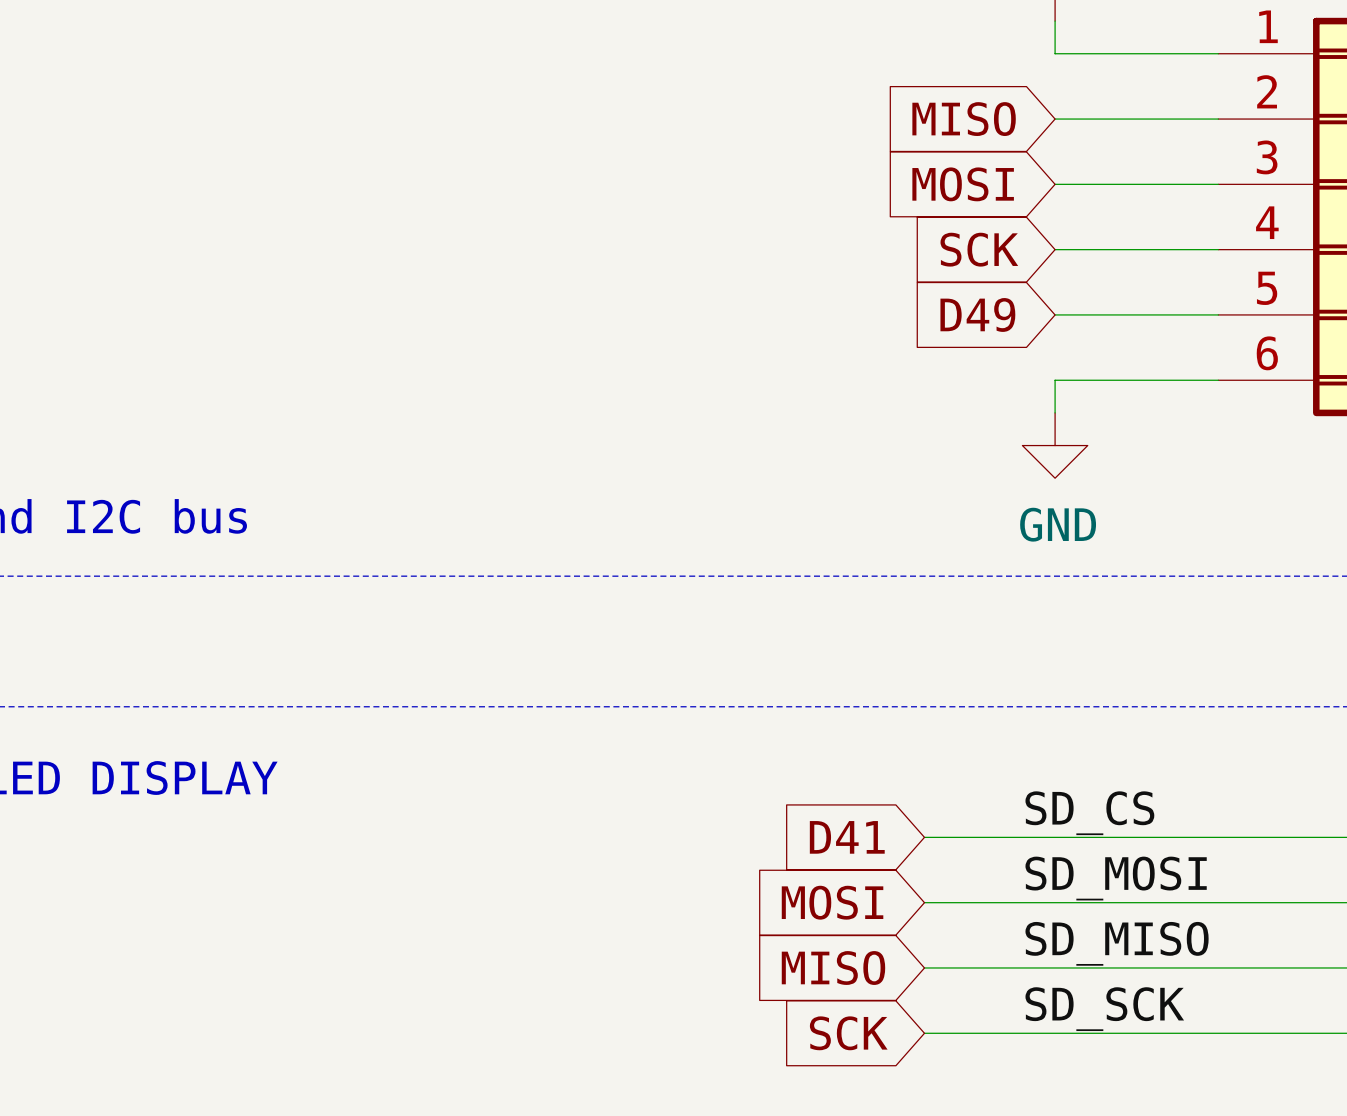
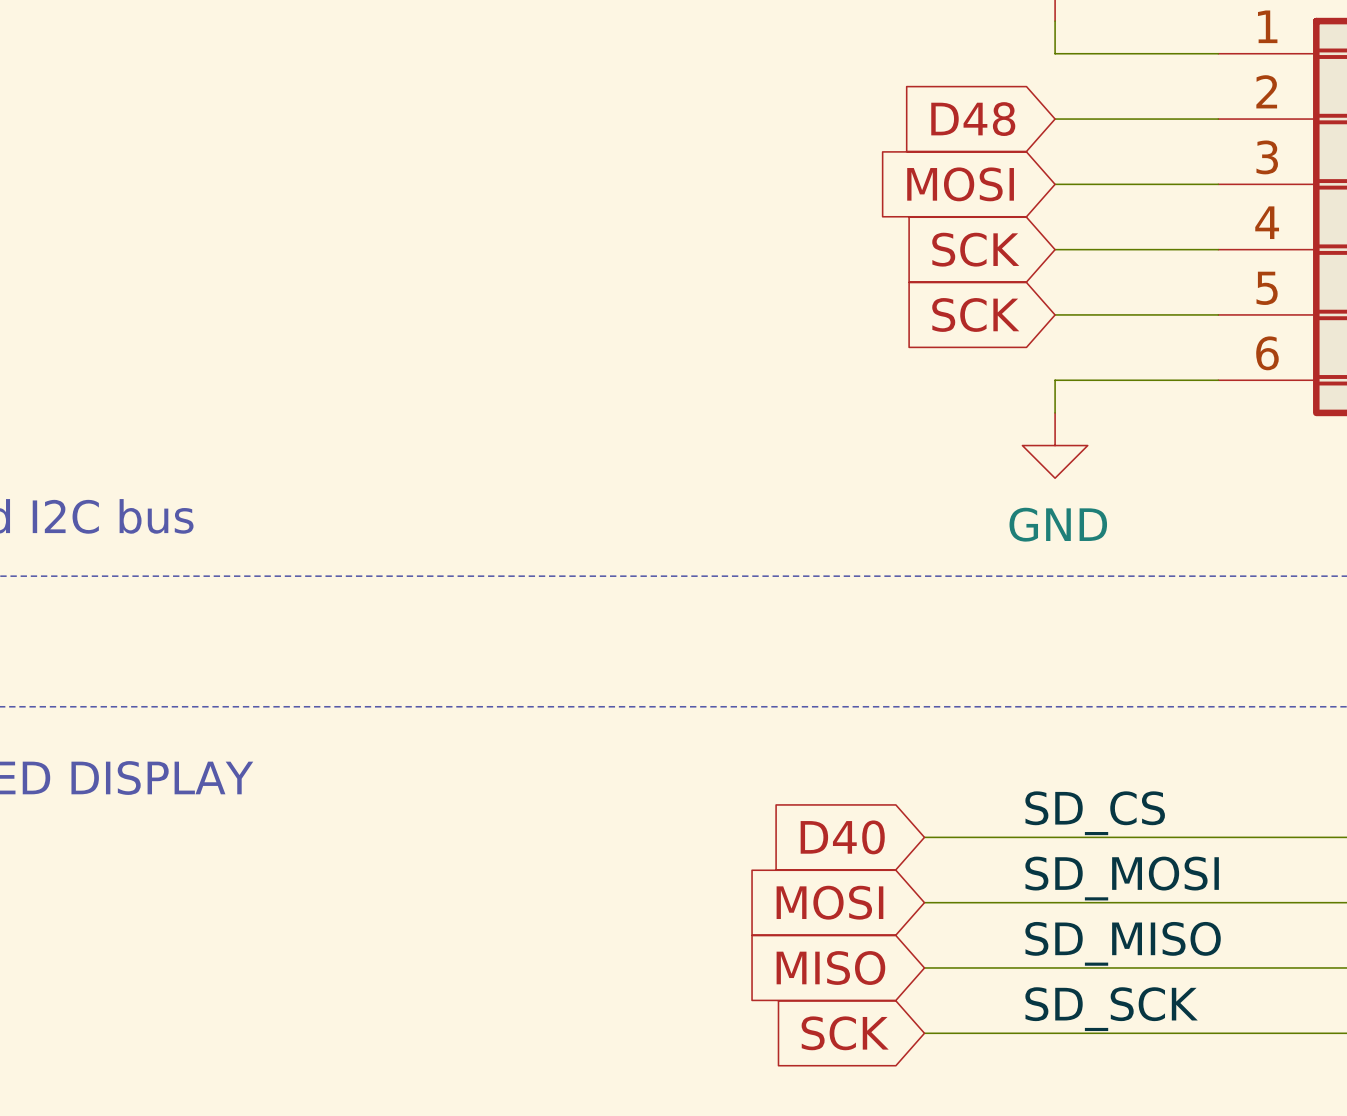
global label: MISO (964, 119) -> D48 (973, 119)
global label: D49 (977, 314) -> SCK (975, 314)
global label: D41 (847, 837) -> D40 (842, 837)

